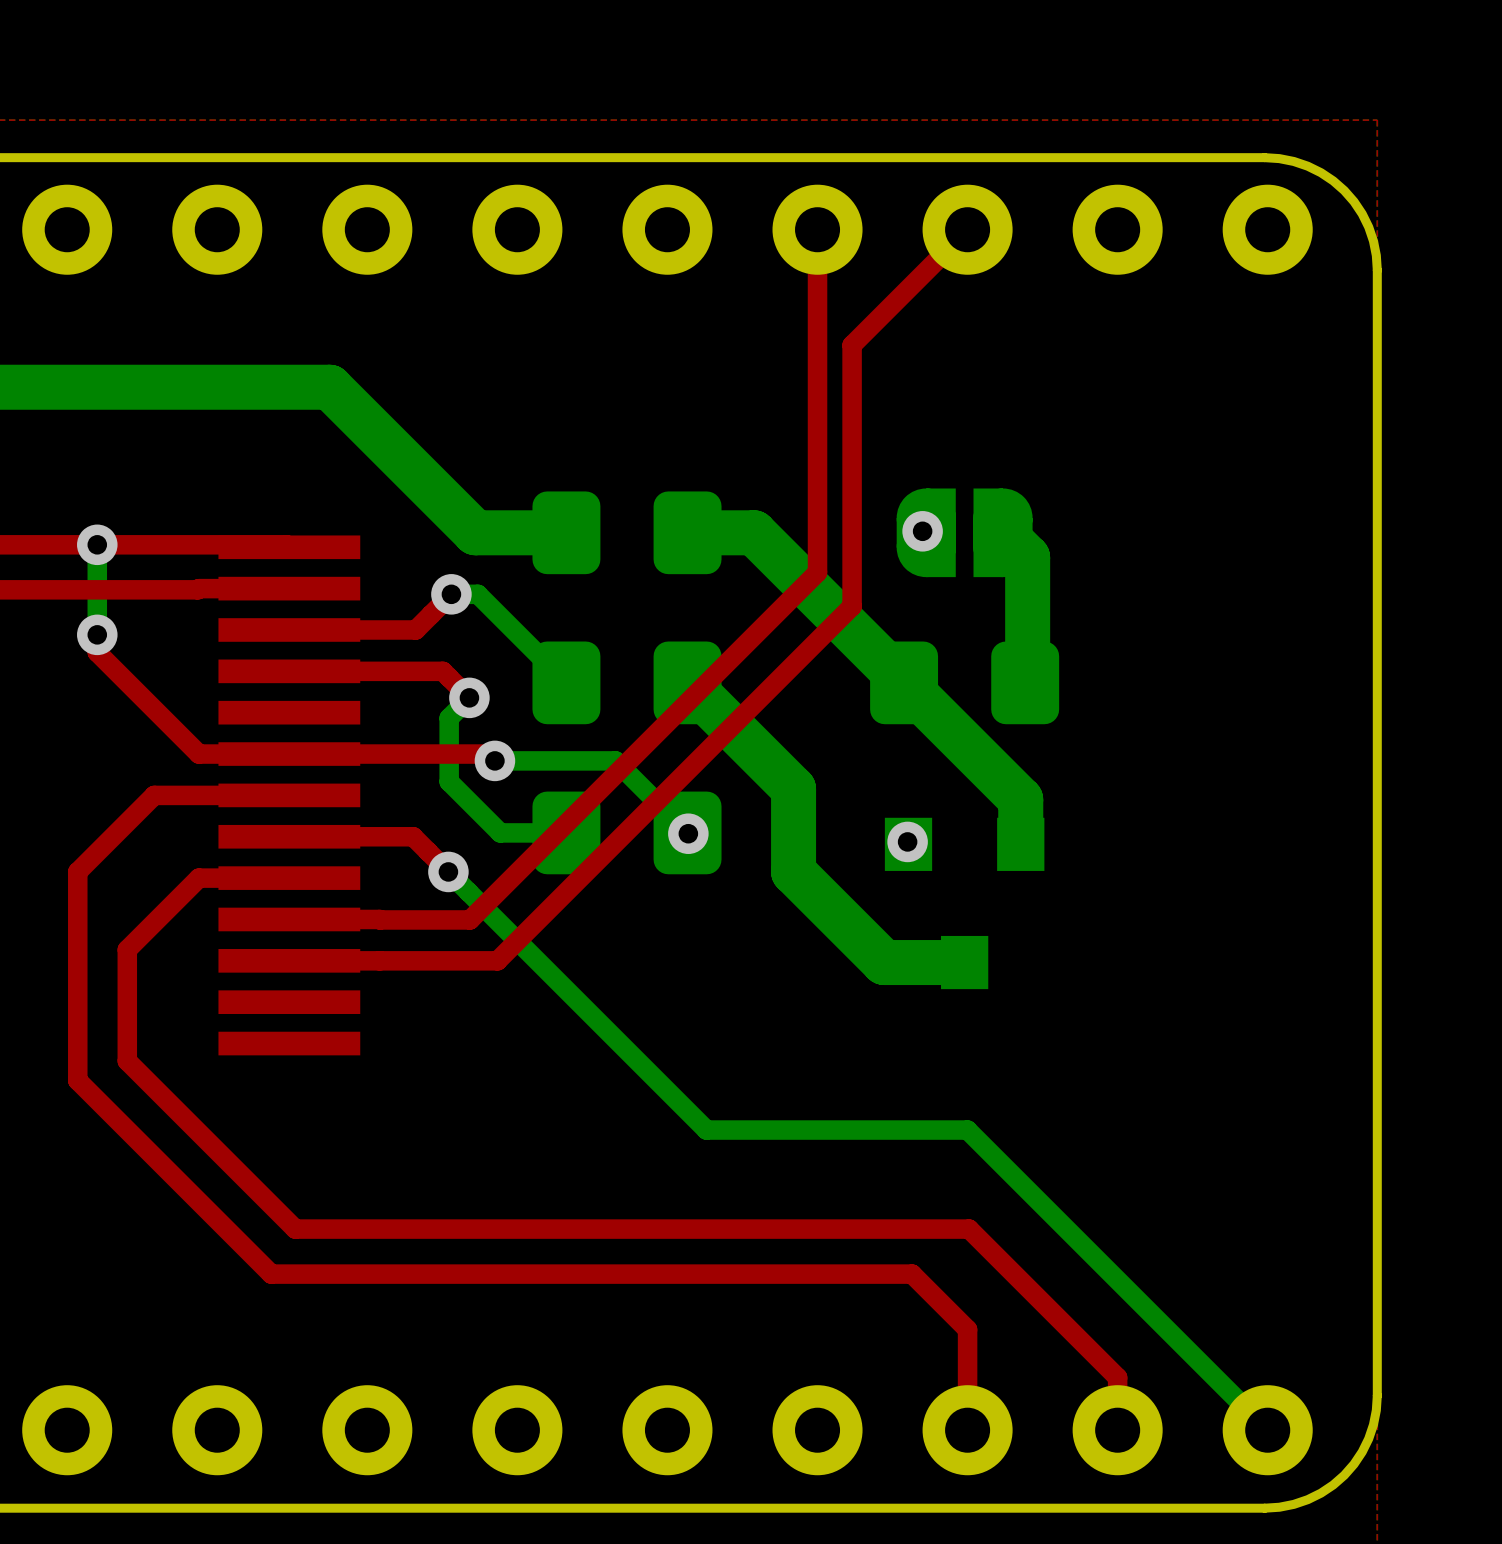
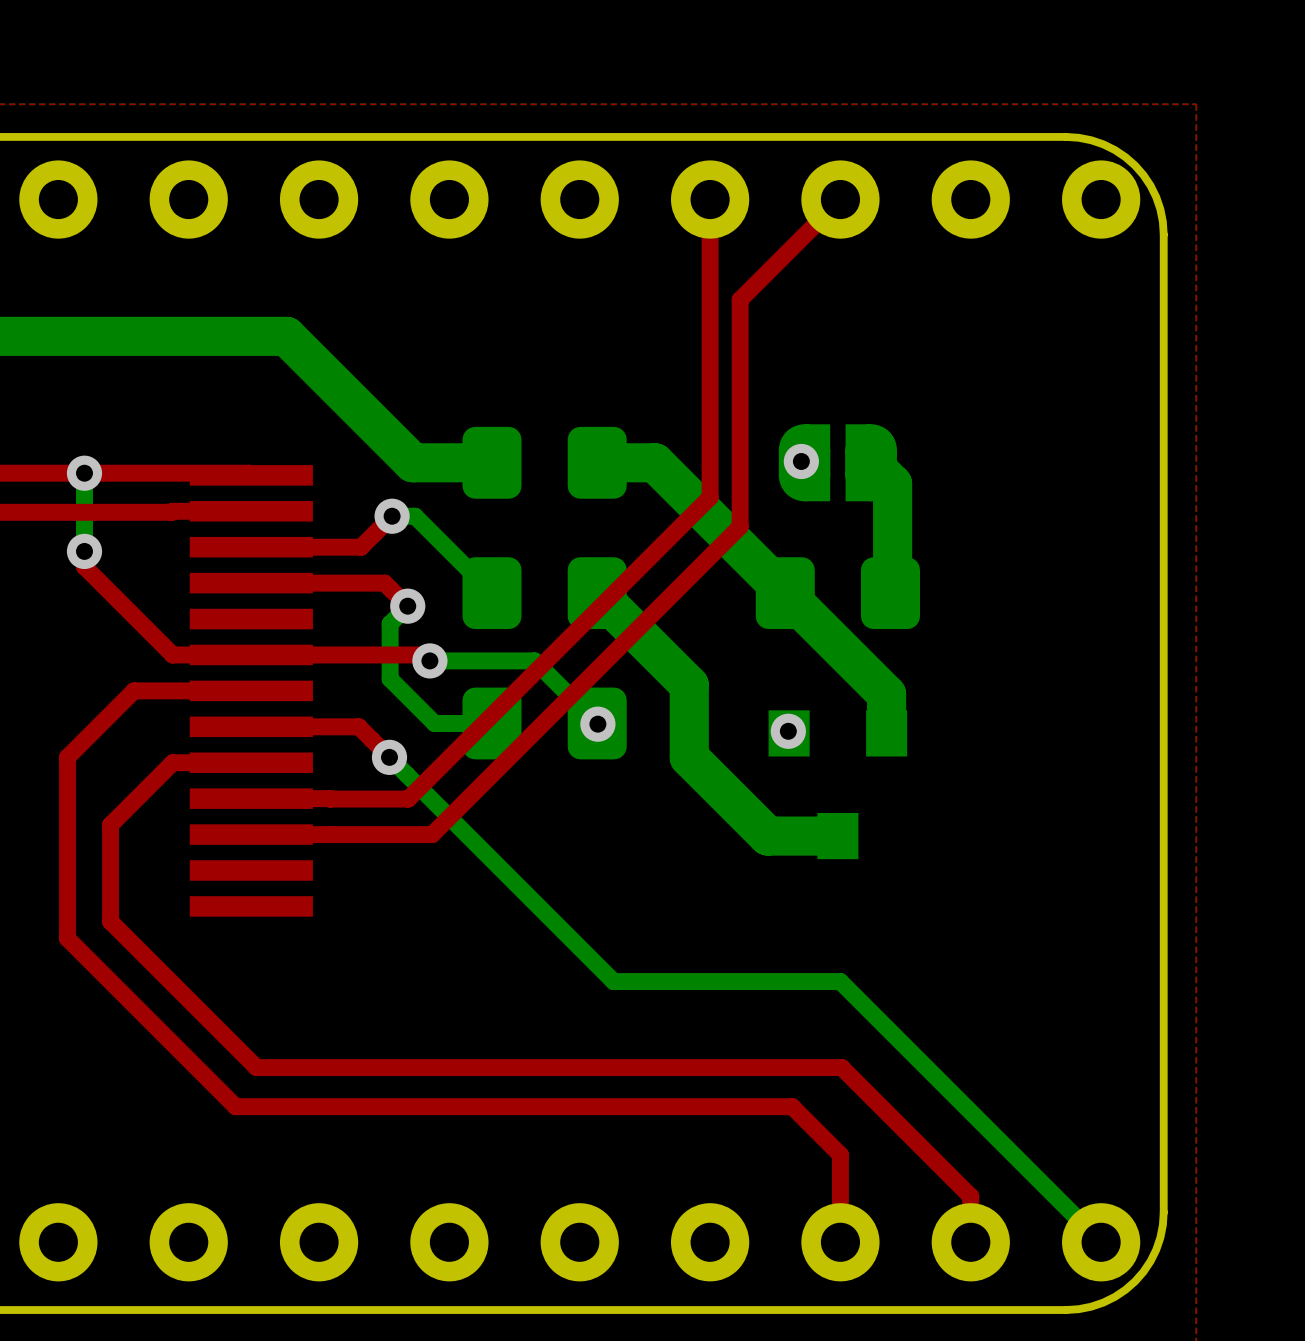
board edge: (1227, 157) (1264, 157) (1293, 161) (1321, 172) (1333, 180) (1354, 201) (1368, 227) (1376, 255) (1377, 270) (1376, 1410) (1368, 1438) (1362, 1451) (1344, 1475) (1321, 1493) (1307, 1499) (1279, 1507) (1227, 1508) -> (1065, 136) (1078, 137) (1103, 144) (1114, 150) (1135, 165) (1150, 185) (1156, 197) (1162, 221) (1163, 234) (1162, 1225) (1156, 1249) (1150, 1261) (1135, 1281) (1125, 1289) (1103, 1302) (1091, 1306) (1065, 1310)

